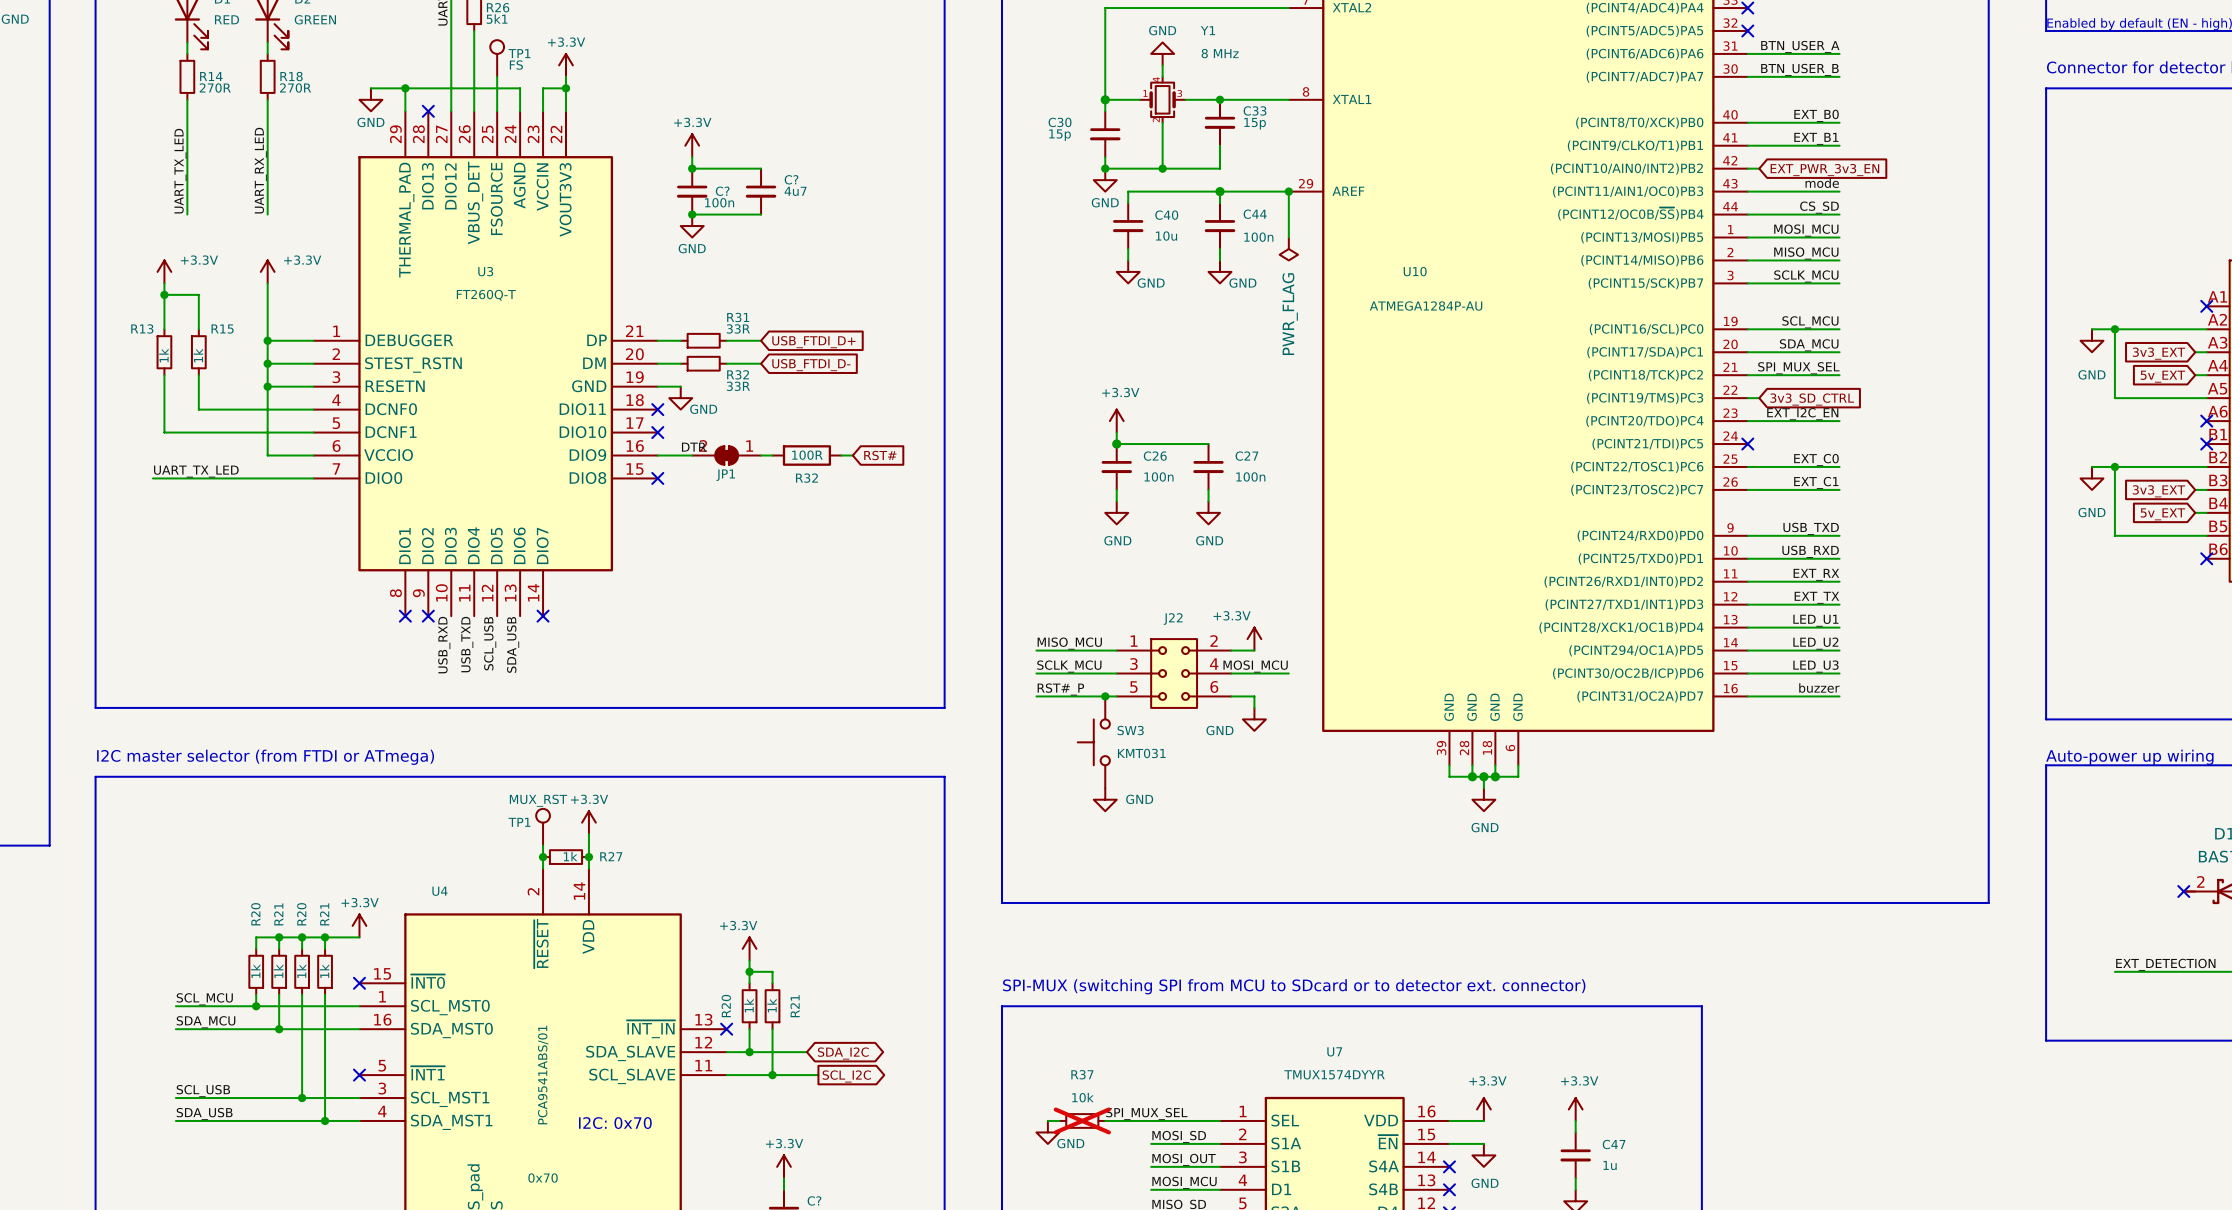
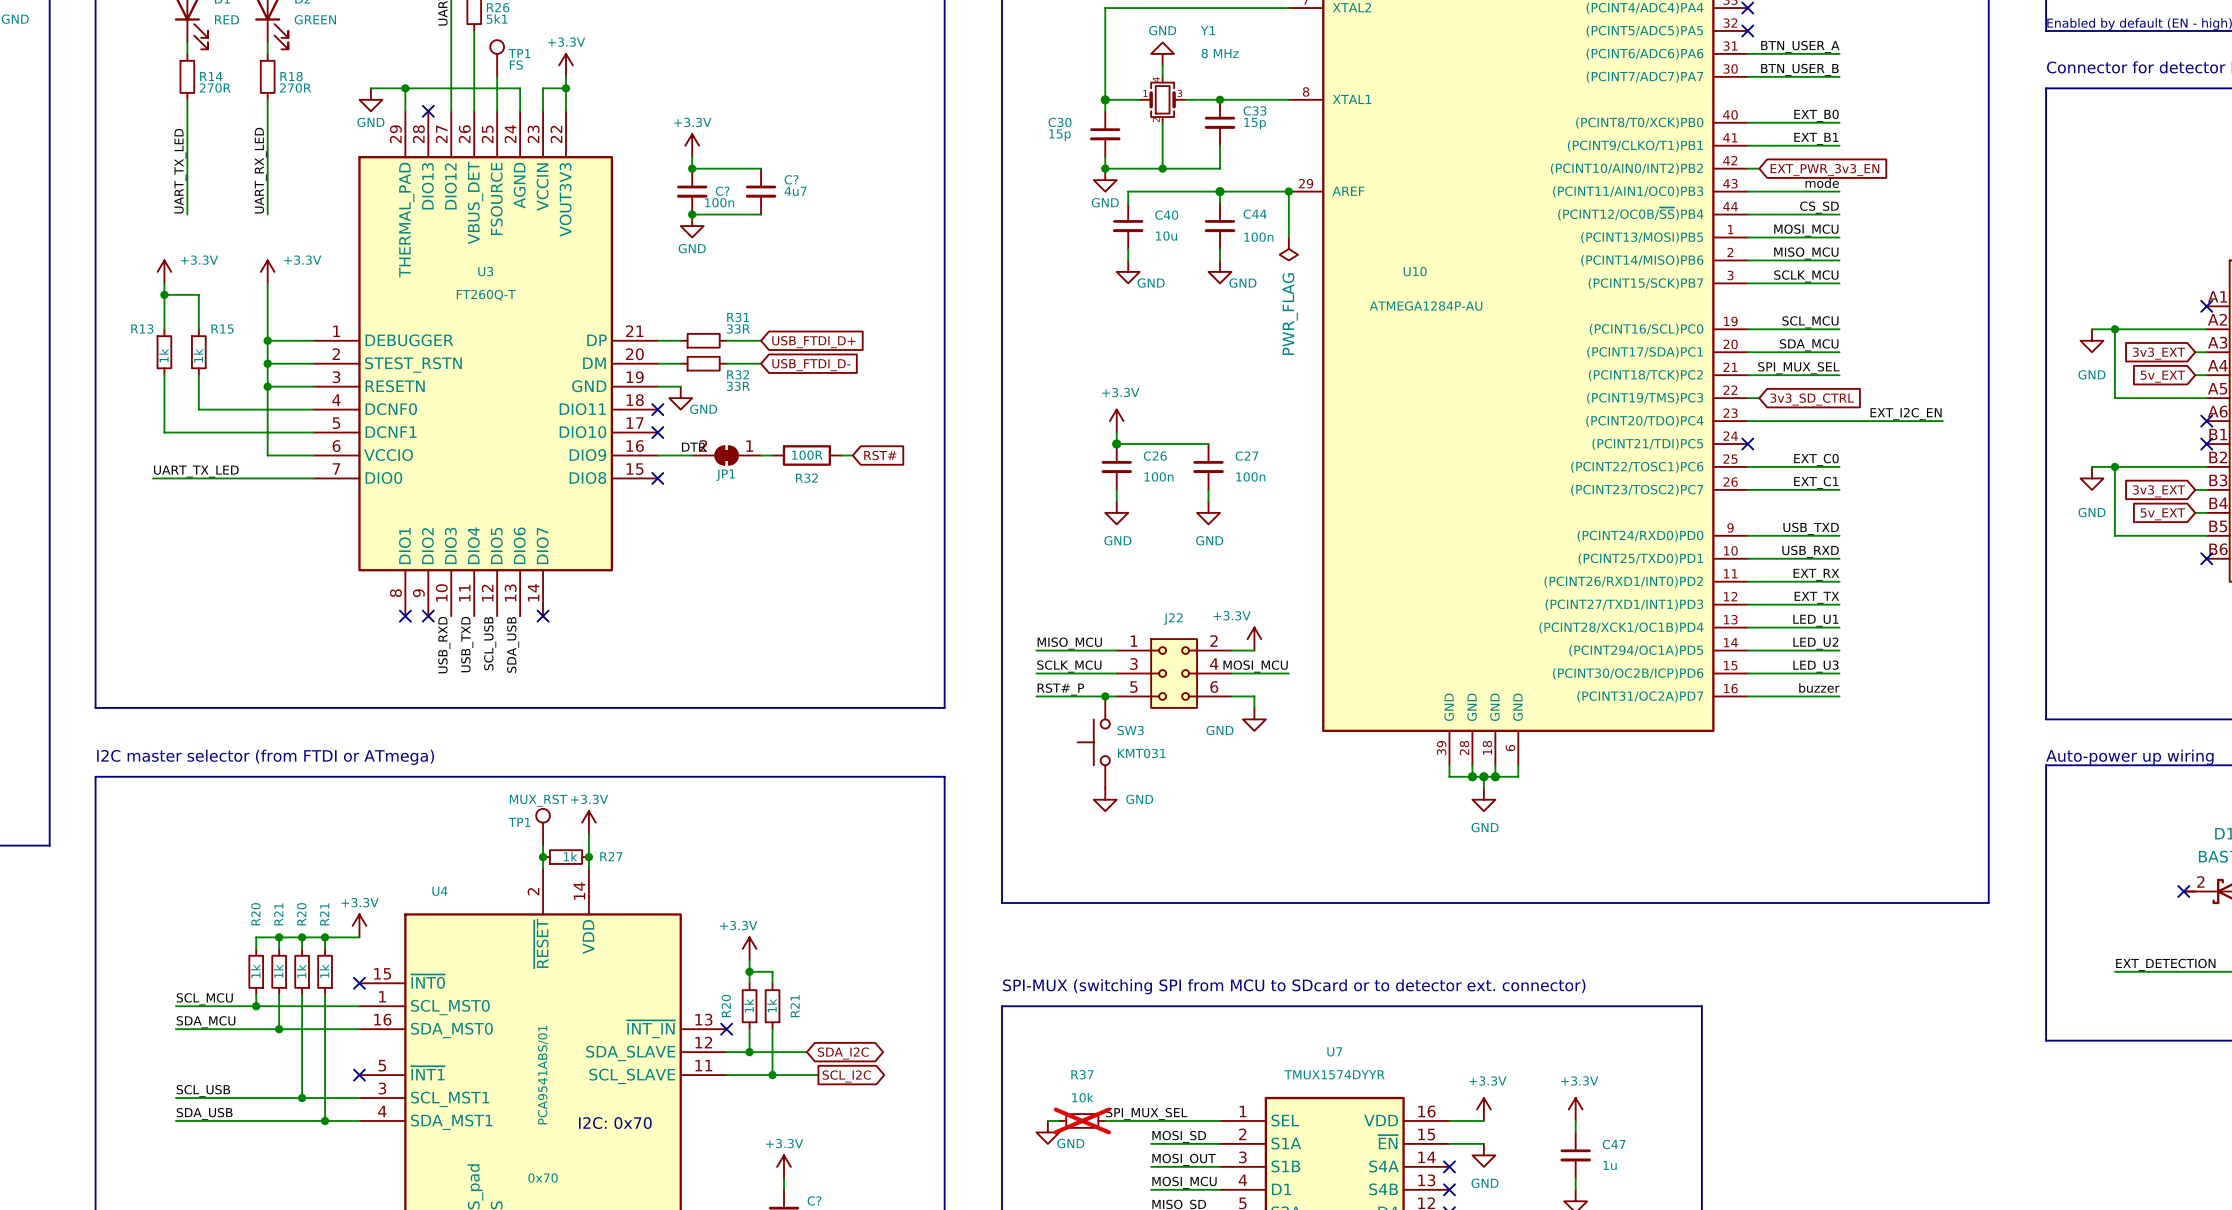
label position: EXT_I2C_EN (1802, 414) -> EXT_I2C_EN (1906, 414)
wire: none -> (1839, 421) (1942, 421)

